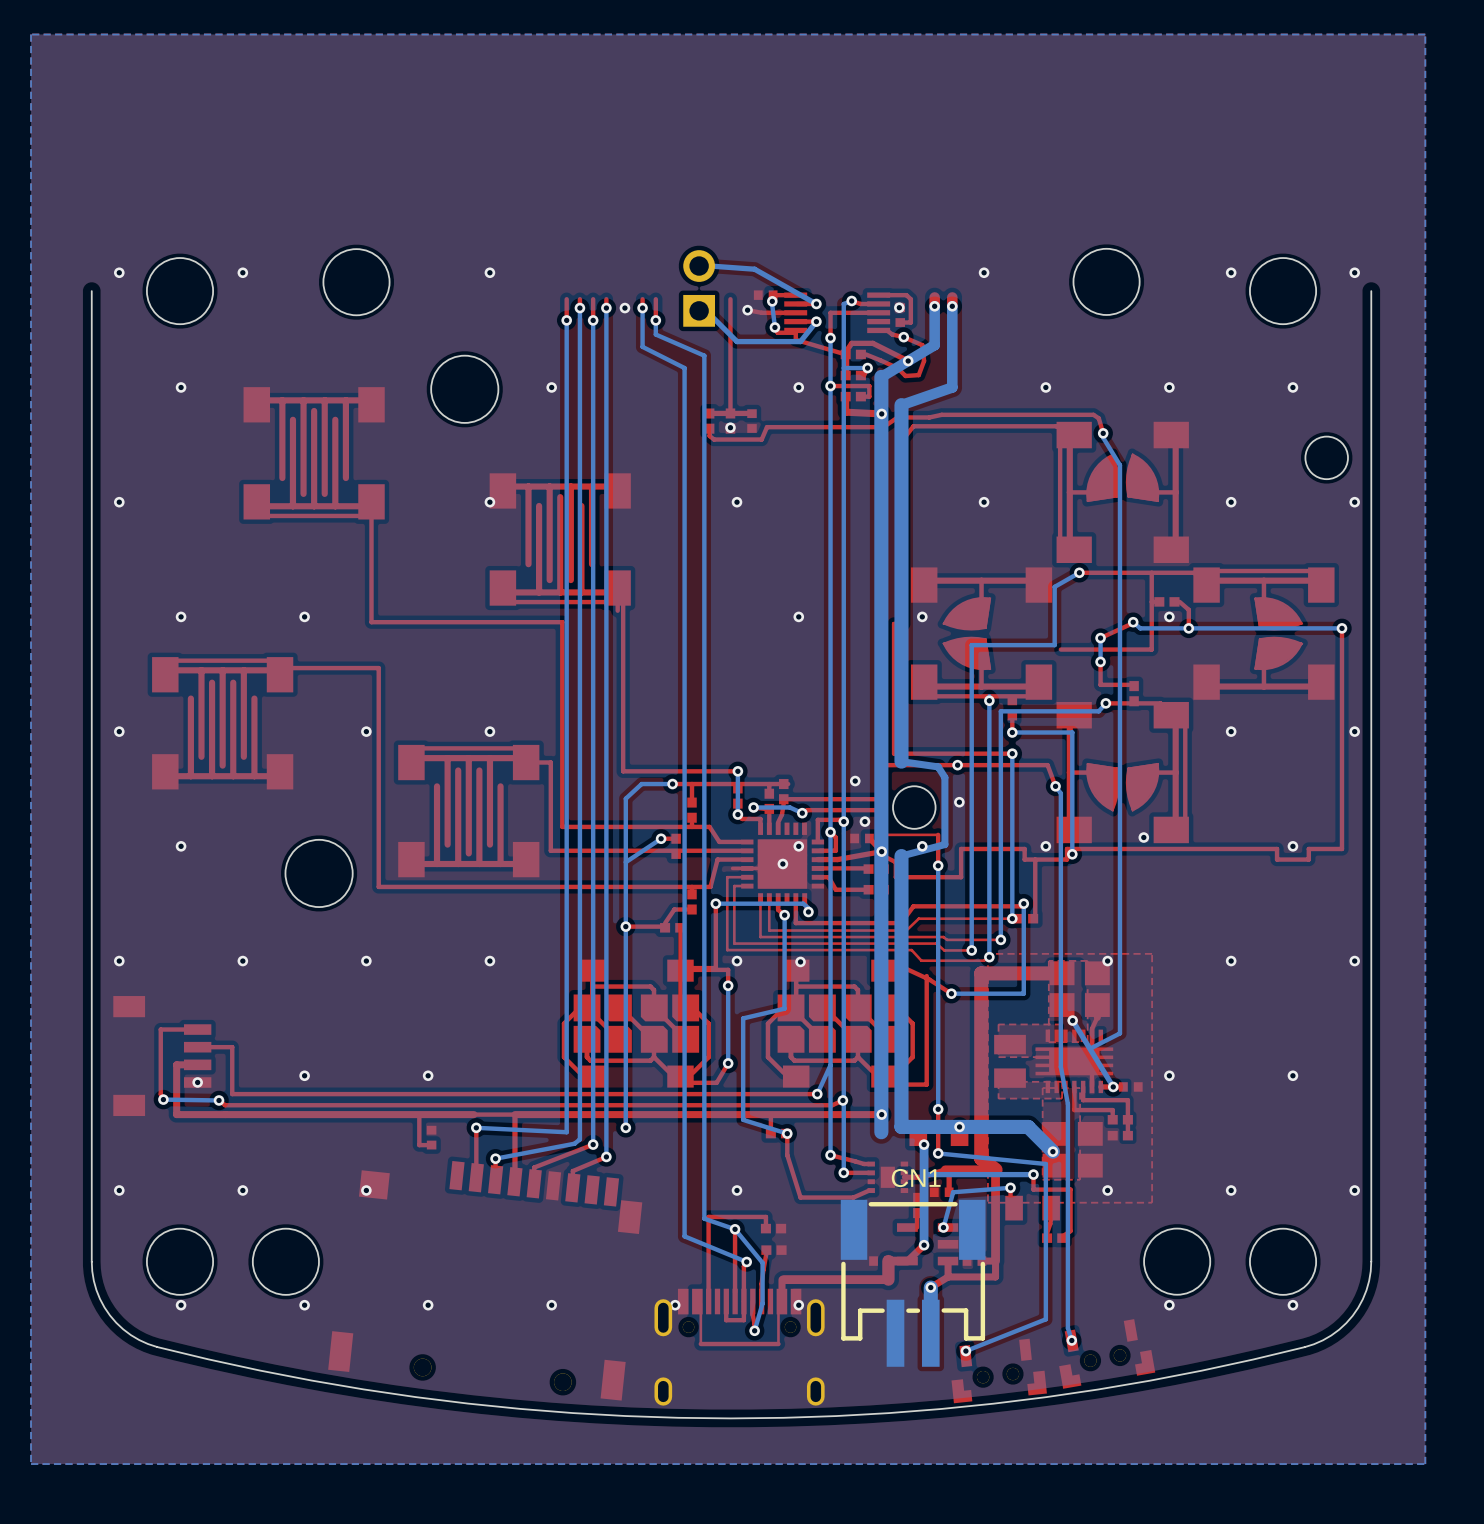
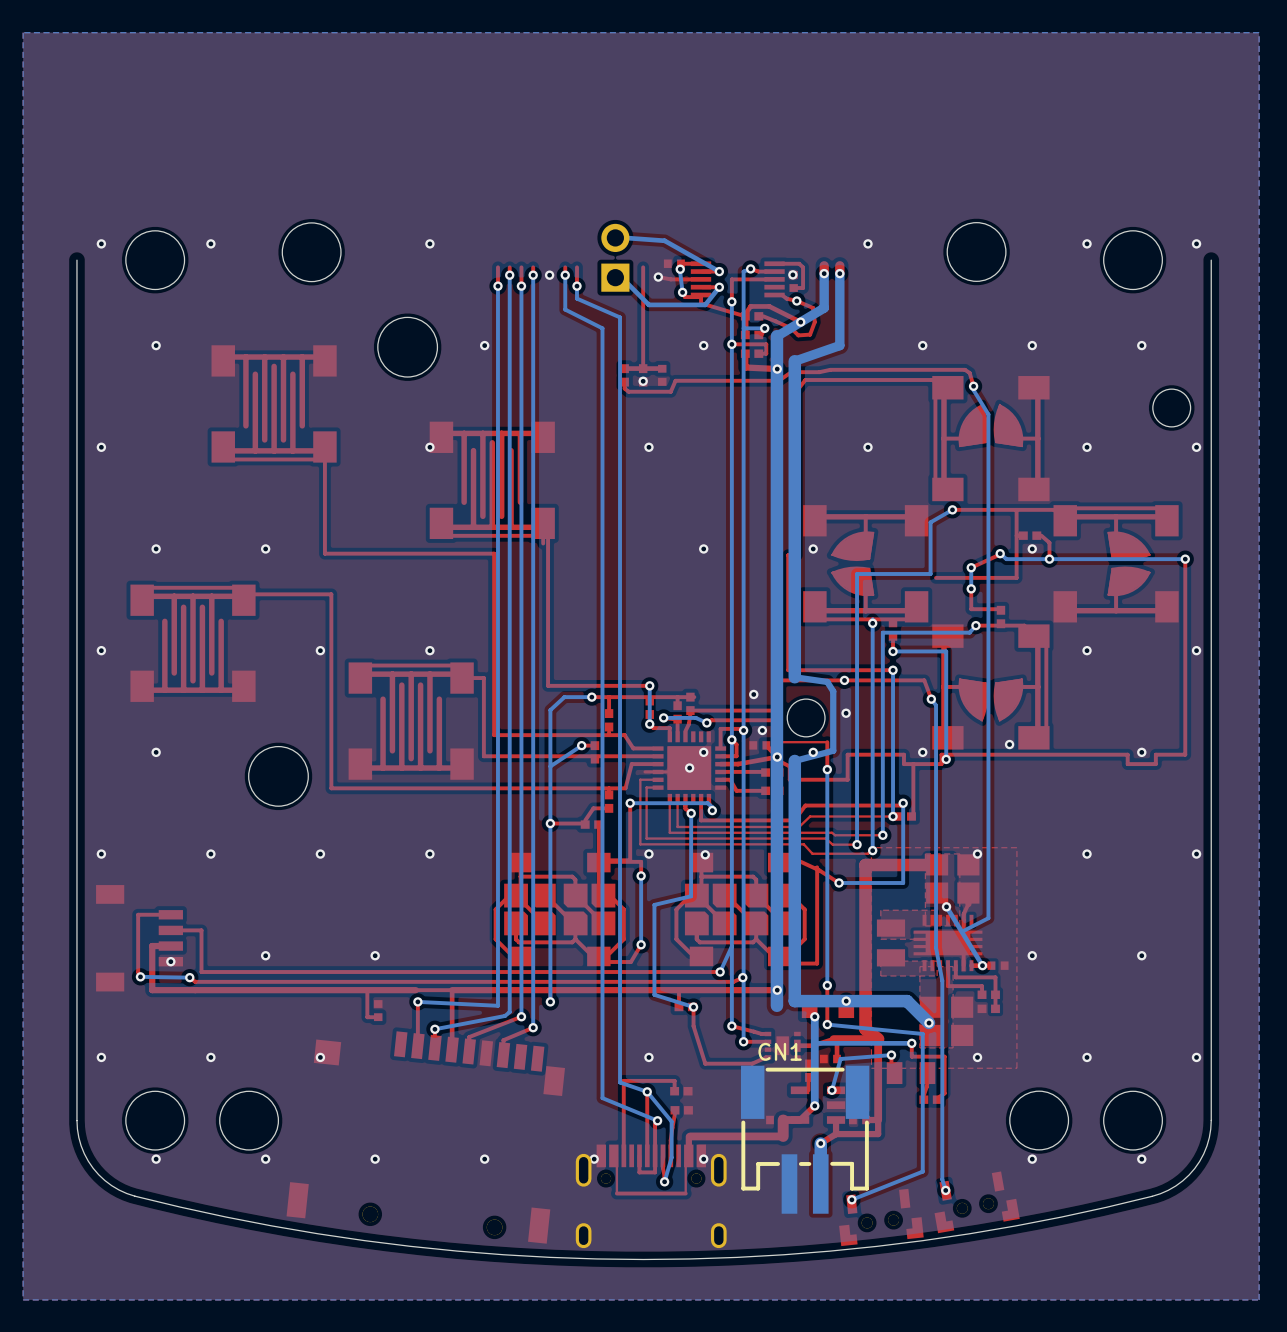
CN1 name position: CN1 (916, 1178) -> CN1 (780, 1051)

